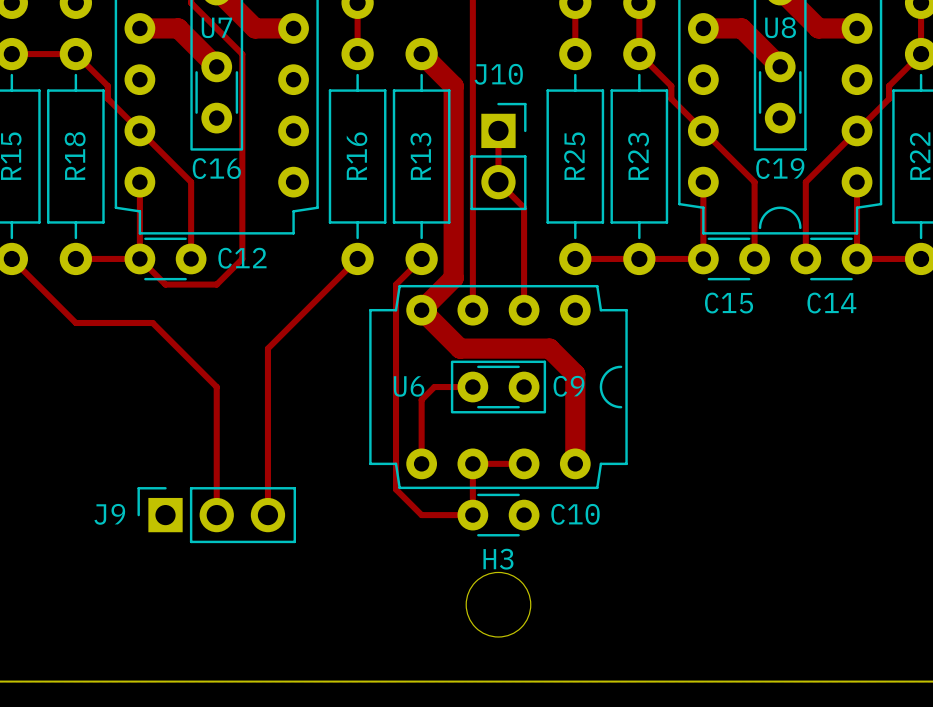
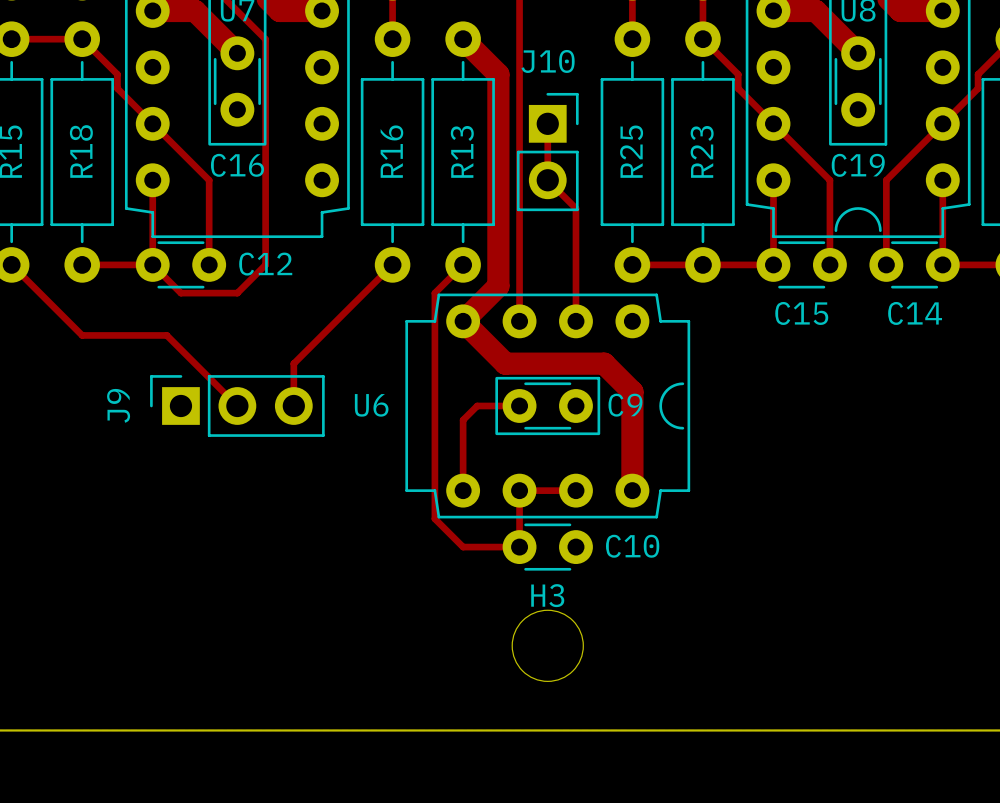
U6 name position: U6 (409, 386) -> U6 (371, 405)
track: (216, 387) (216, 515) -> none
track: (267, 387) (267, 515) -> none
J9 name rotation: 0° (109, 514) -> 90° counterclockwise (118, 405)
J9 position: (216, 515) -> (237, 405)

